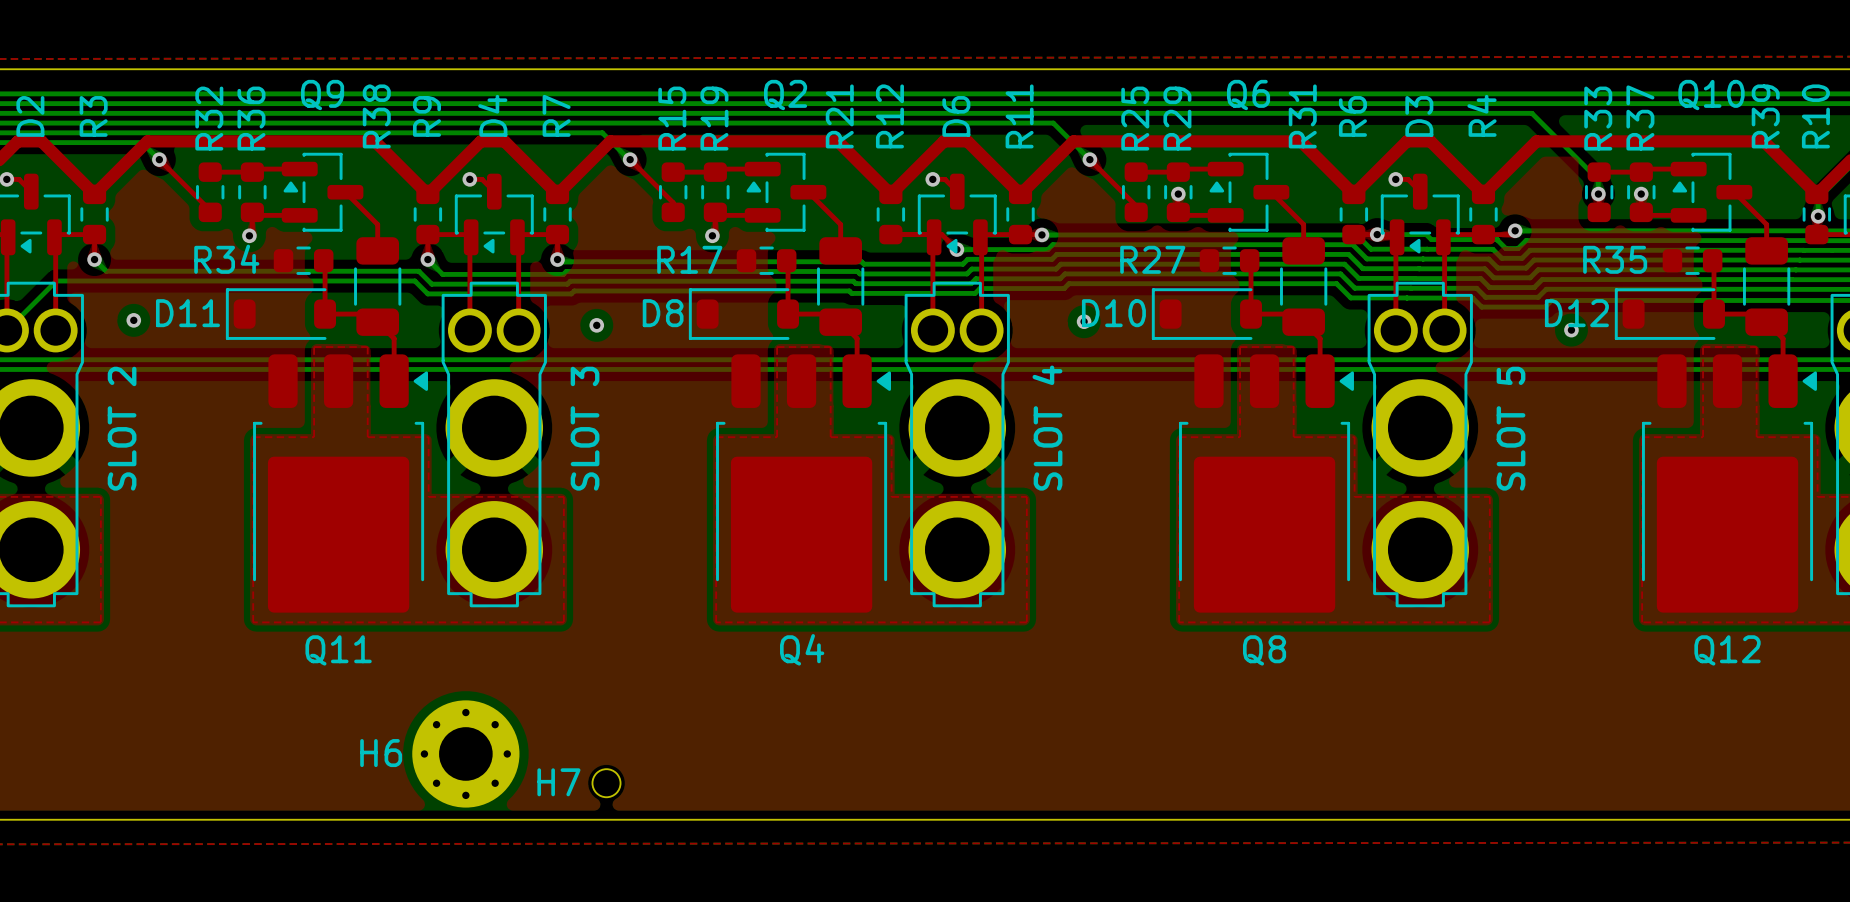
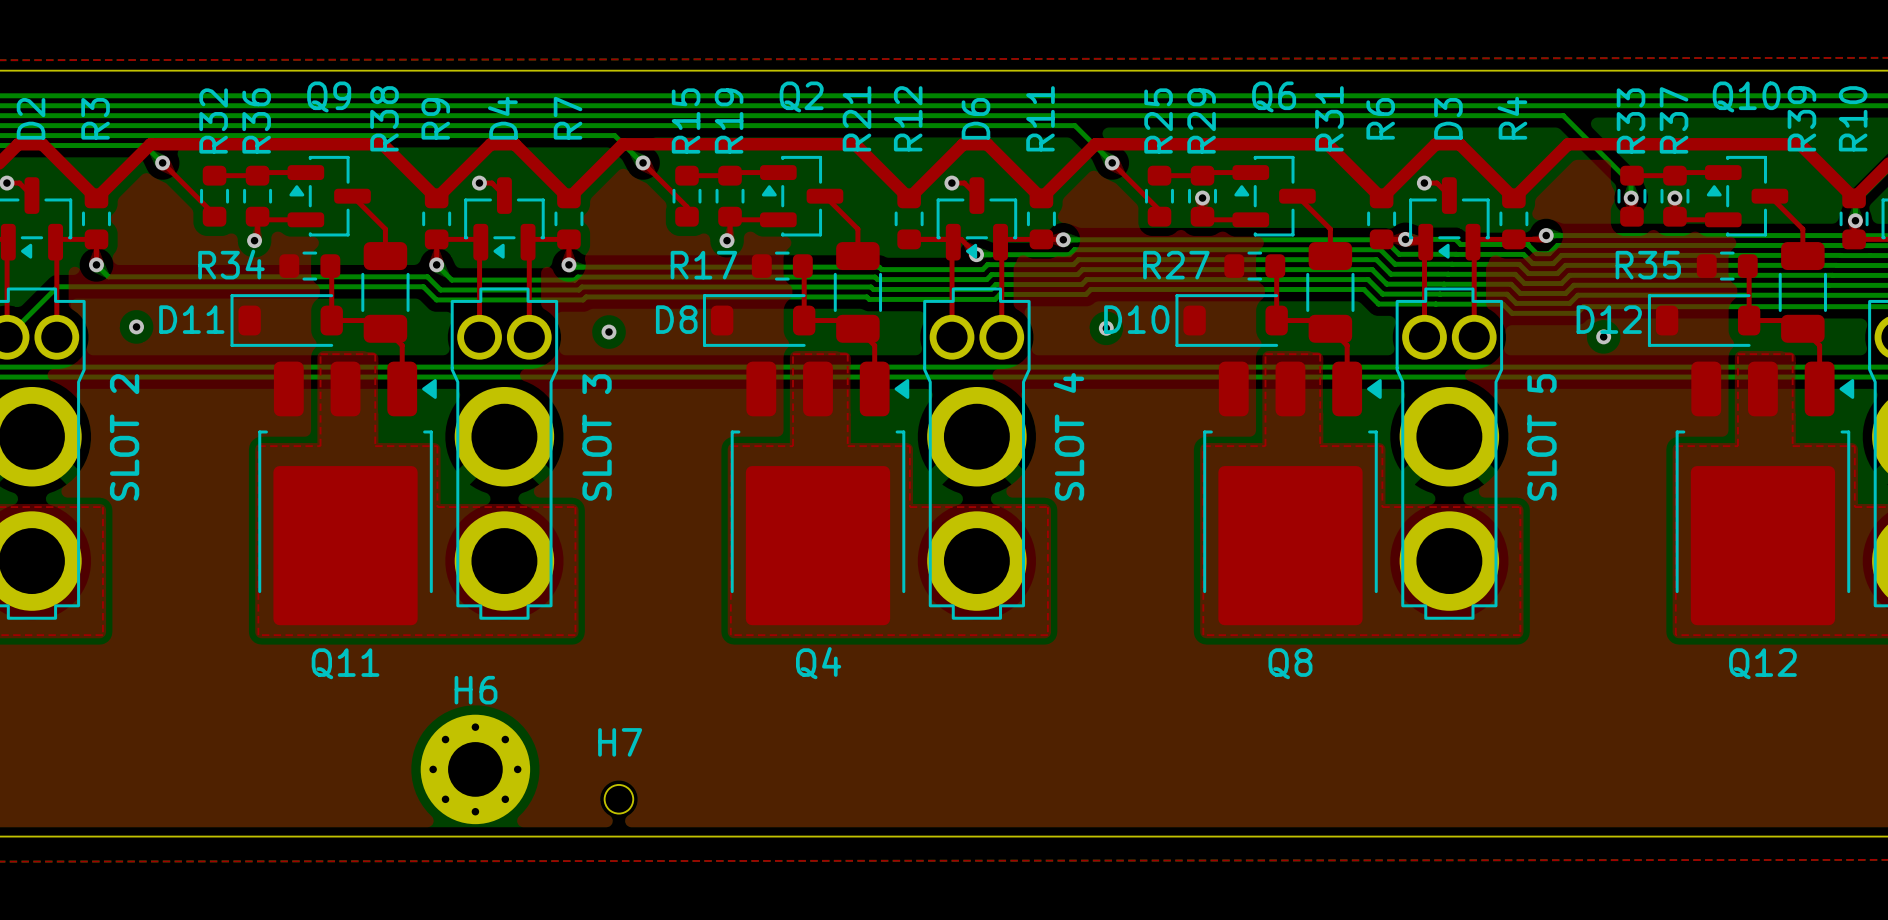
H6 name position: H6 (381, 753) -> H6 (476, 690)
H7 name position: H7 (558, 782) -> H7 (620, 742)

